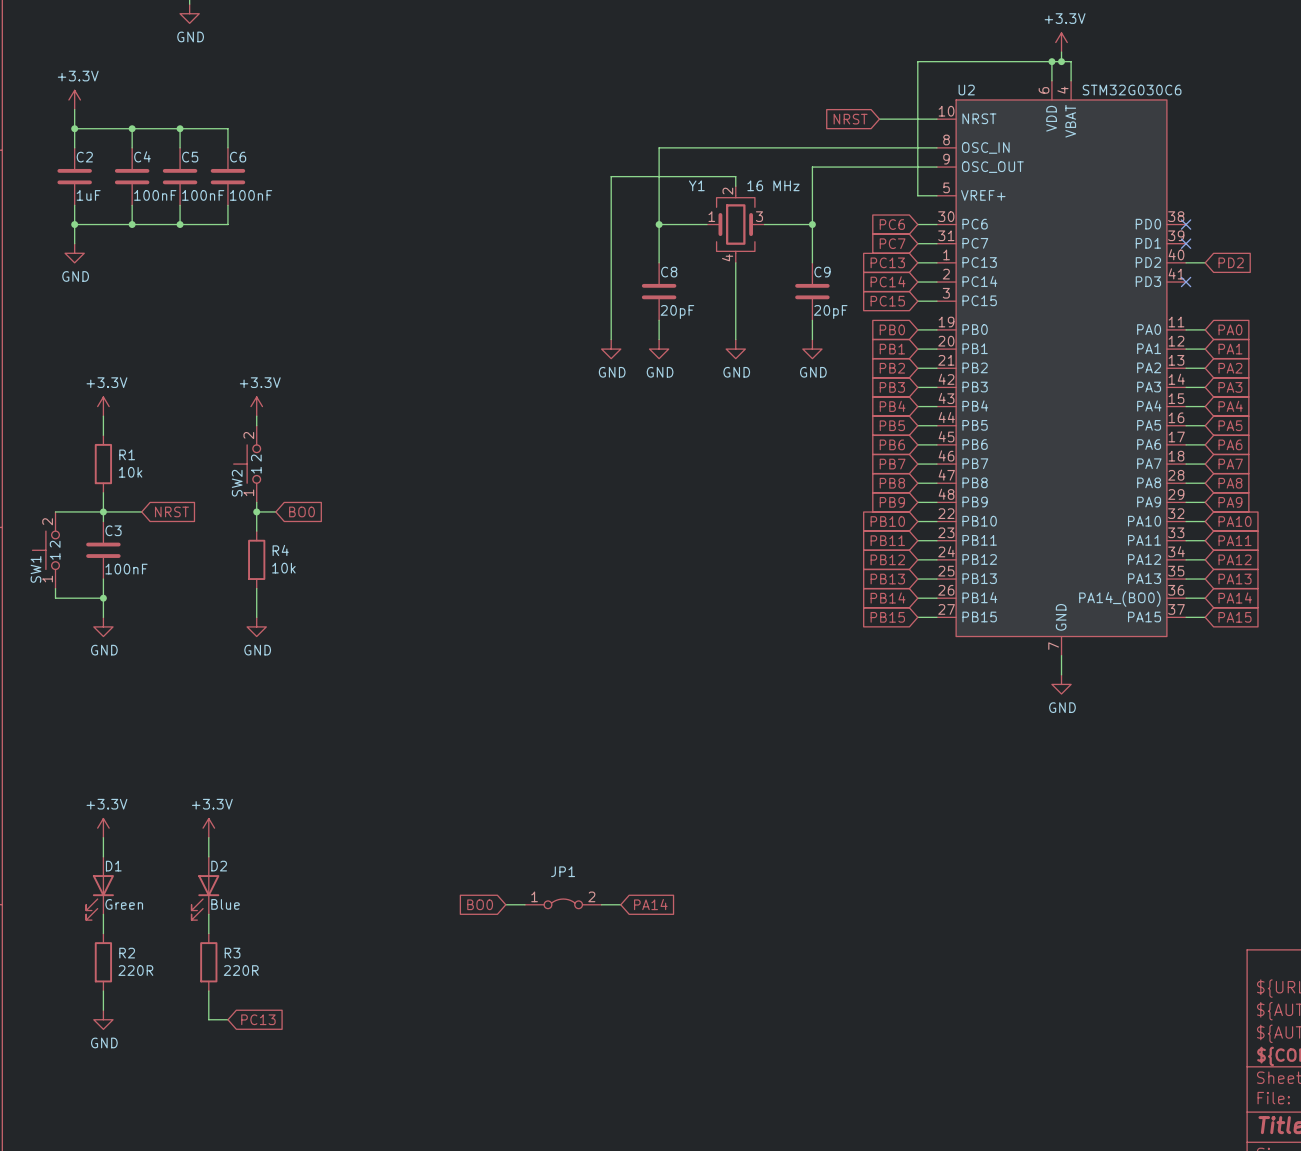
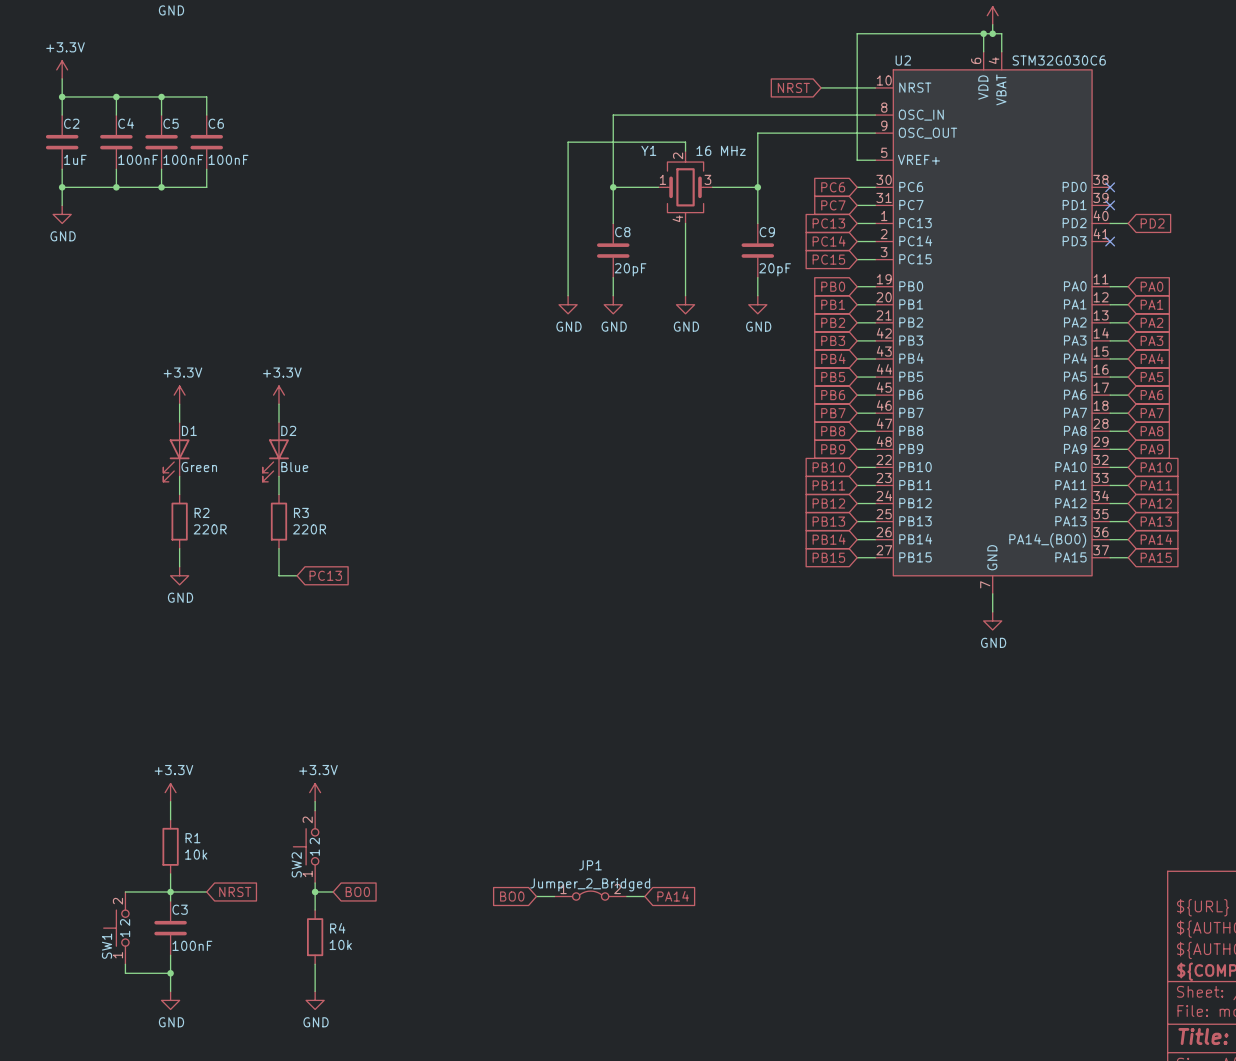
power symbol: +3.3V (103, 406) -> none
power symbol: +3.3V (256, 406) -> none
wire: (103, 416) (103, 435) -> (179, 404) (179, 422)
wire: (256, 416) (256, 425) -> none
power symbol: none -> +3.3V (179, 395)
power symbol: none -> +3.3V (278, 395)
wire: none -> (278, 404) (278, 422)
R1 position: (103, 464) -> (170, 846)
SW2 position: (247, 464) -> (306, 846)
wire: (103, 492) (103, 521) -> none
wire: (256, 502) (256, 531) -> none
wire: (55, 511) (141, 511) -> none
junction: (103, 511) -> none
global label: NRST (171, 511) -> none
wire: (256, 511) (275, 511) -> none
junction: (256, 511) -> none
global label: BO0 (302, 511) -> none
wire: none -> (179, 476) (179, 494)
wire: none -> (278, 476) (278, 494)
SW1 position: (45, 550) -> (116, 928)
C3 position: (103, 550) -> (170, 928)
R4 position: (256, 559) -> (315, 937)
wire: (103, 579) (103, 617) -> none
wire: (55, 588) (55, 598) (103, 598) -> none
wire: (256, 588) (256, 617) -> none
junction: (103, 598) -> none
wire: none -> (179, 548) (179, 566)
wire: none -> (278, 548) (278, 575) (297, 575)
power symbol: GND (103, 626) -> none
power symbol: GND (256, 626) -> none
power symbol: none -> GND (179, 575)
global label: none -> PC13 (325, 575)
power symbol: +3.3V (103, 828) -> none
power symbol position: +3.3V (208, 828) -> +3.3V (170, 792)
wire: (103, 837) (103, 856) -> none
wire: (208, 837) (208, 856) -> none
power symbol: none -> +3.3V (315, 792)
wire: none -> (315, 801) (315, 810)
D1 position: (100, 888) -> (176, 452)
D2 position: (205, 888) -> (275, 452)
JP1 position: (563, 903) -> (590, 895)
global label: BO0 (480, 904) -> none
wire: (505, 904) (524, 904) -> (536, 896) (554, 896)
wire: (601, 904) (620, 904) -> (626, 896) (644, 896)
global label position: PA14 (650, 904) -> PA14 (673, 896)
wire: (103, 914) (103, 933) -> none
wire: (208, 914) (208, 933) -> (170, 801) (170, 819)
wire: none -> (170, 873) (170, 901)
R2 position: (103, 962) -> (179, 521)
R3 position: (208, 962) -> (278, 521)
wire: none -> (315, 882) (315, 910)
JP1 value: none -> Jumper_2_Bridged (590, 884)
wire: none -> (125, 891) (206, 891)
junction: none -> (170, 891)
global label: none -> NRST (235, 891)
wire: none -> (315, 891) (333, 891)
junction: none -> (315, 891)
global label: none -> BO0 (357, 891)
global label: none -> BO0 (512, 896)
wire: (103, 991) (103, 1010) -> none
wire: (208, 991) (208, 1019) (227, 1019) -> none
power symbol position: GND (103, 1019) -> GND (170, 1000)
global label: PC13 (258, 1019) -> none
wire: none -> (170, 955) (170, 991)
wire: none -> (125, 964) (125, 973) (170, 973)
wire: none -> (315, 964) (315, 991)
junction: none -> (170, 973)
power symbol: none -> GND (315, 1000)

